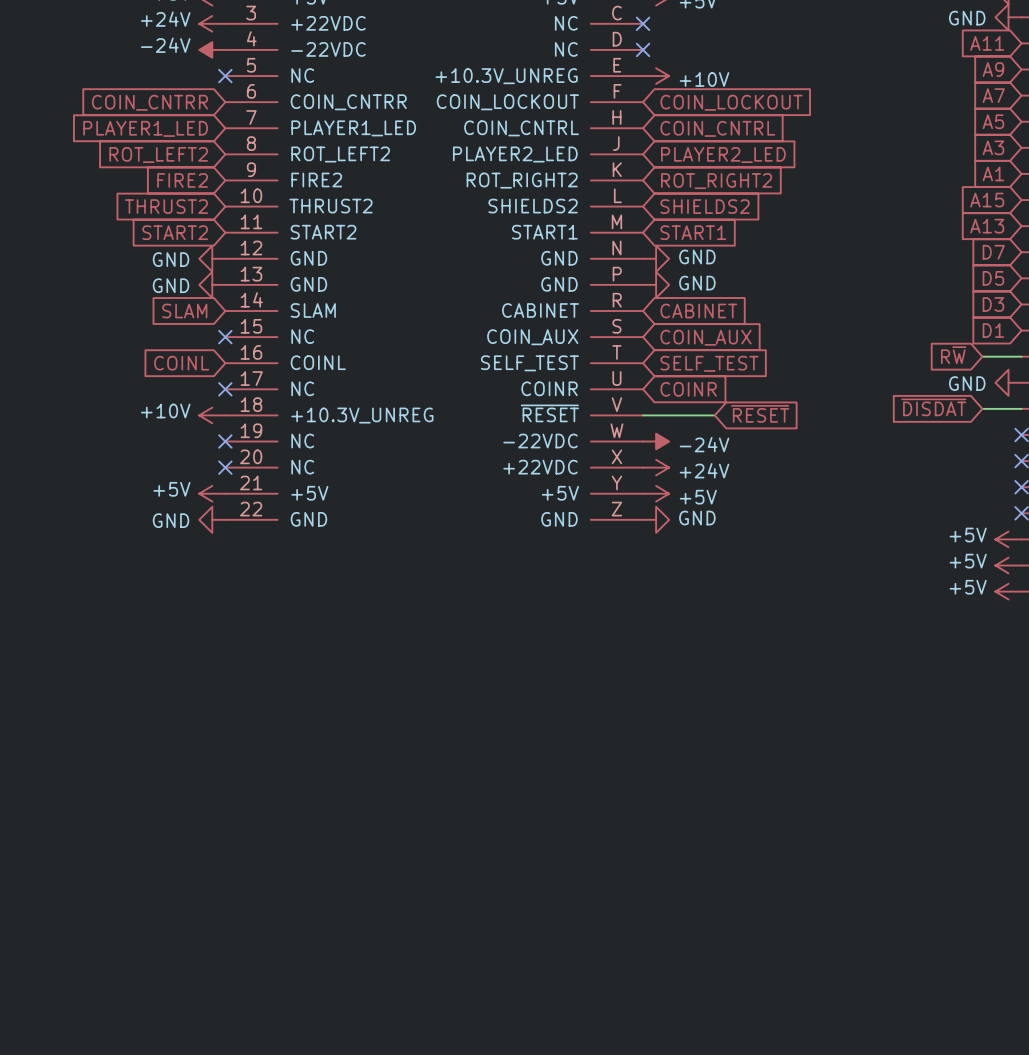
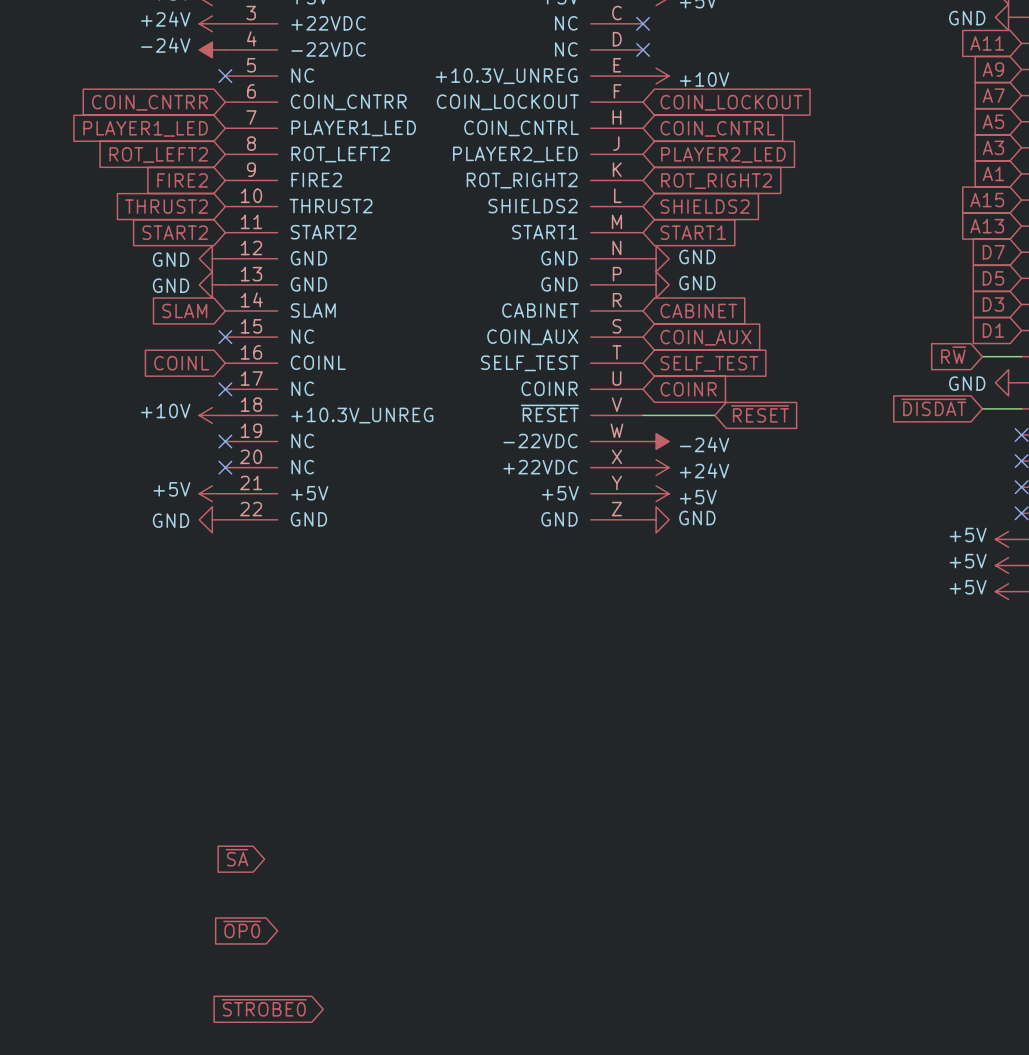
global label: none -> ~{SA} (237, 857)
global label: none -> ~{OP0} (242, 929)
global label: none -> ~{STROBE0} (264, 1007)

